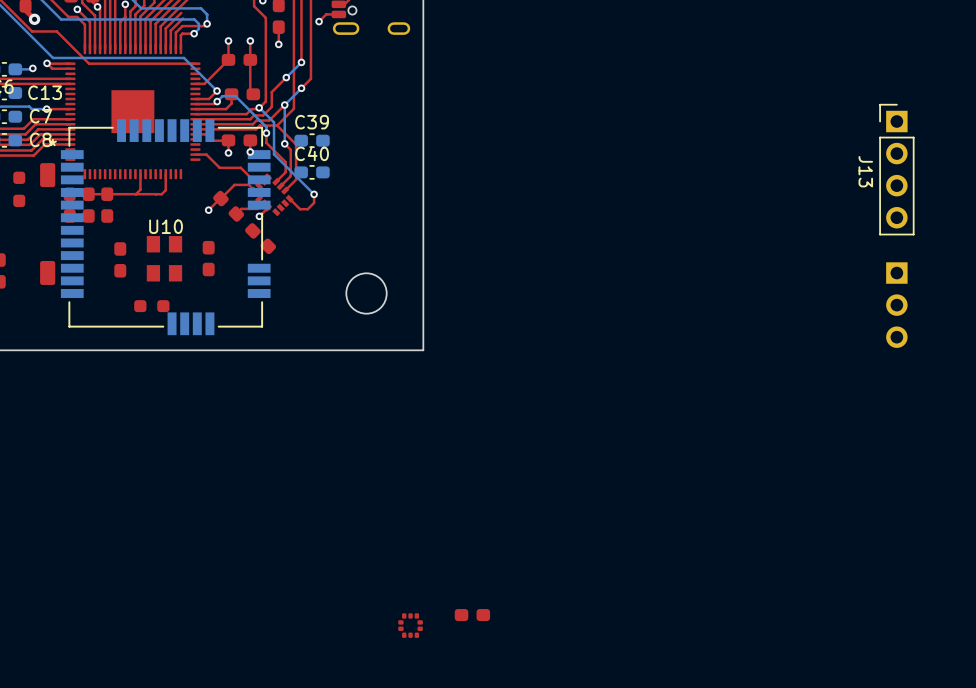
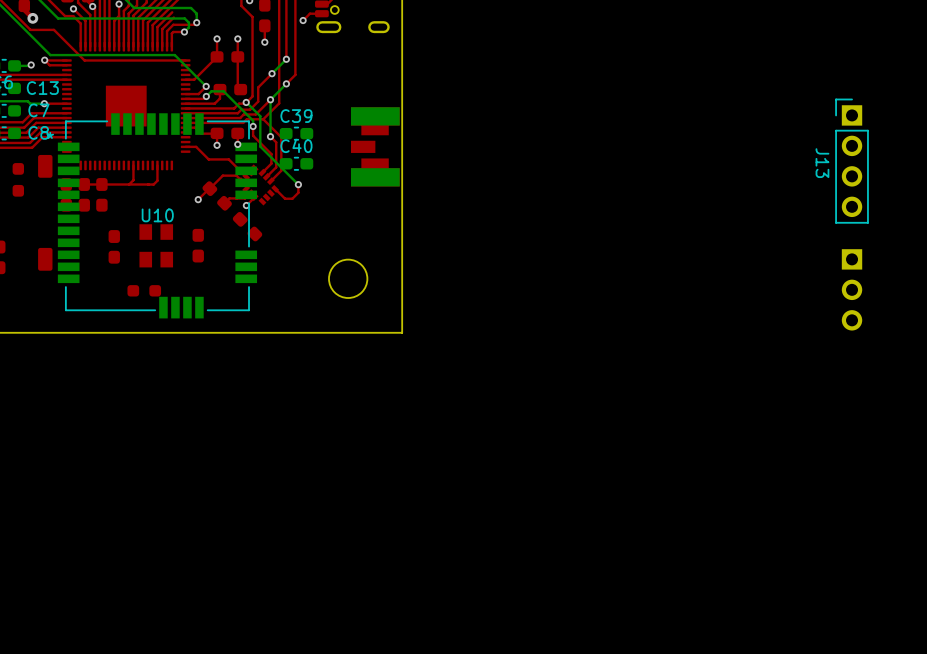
part: none -> (375, 146)
part: (472, 615) -> none
part: (410, 625) -> none

